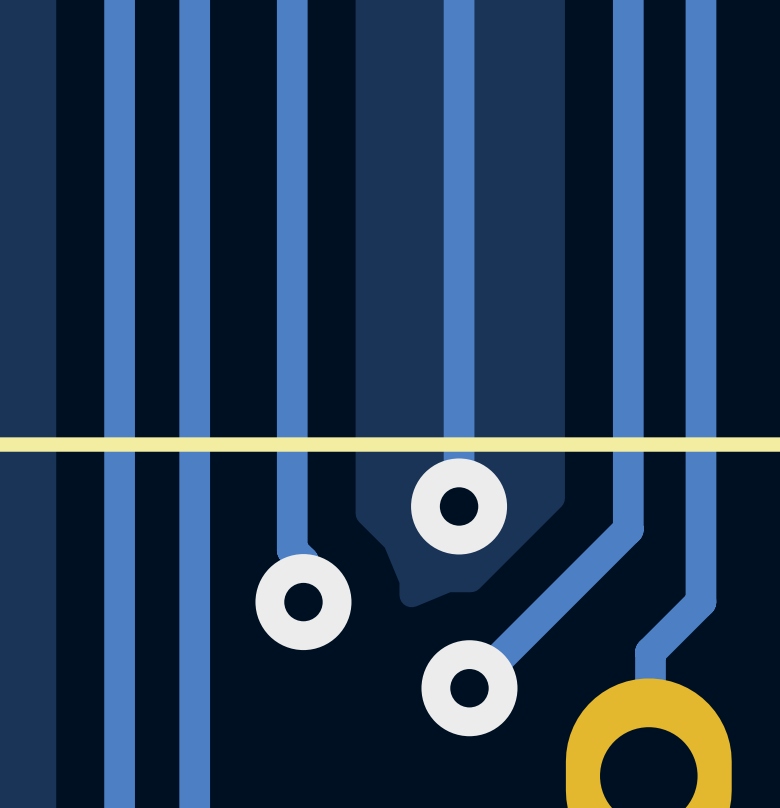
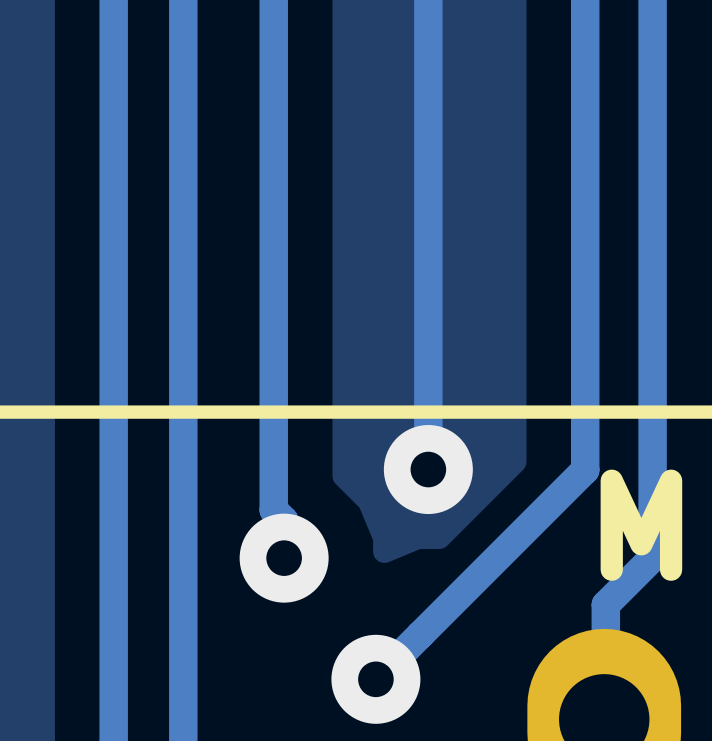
track: (628, 506) (628, 529) (469, 688) -> (585, 469) (375, 679)
via position: (469, 688) -> (375, 679)

